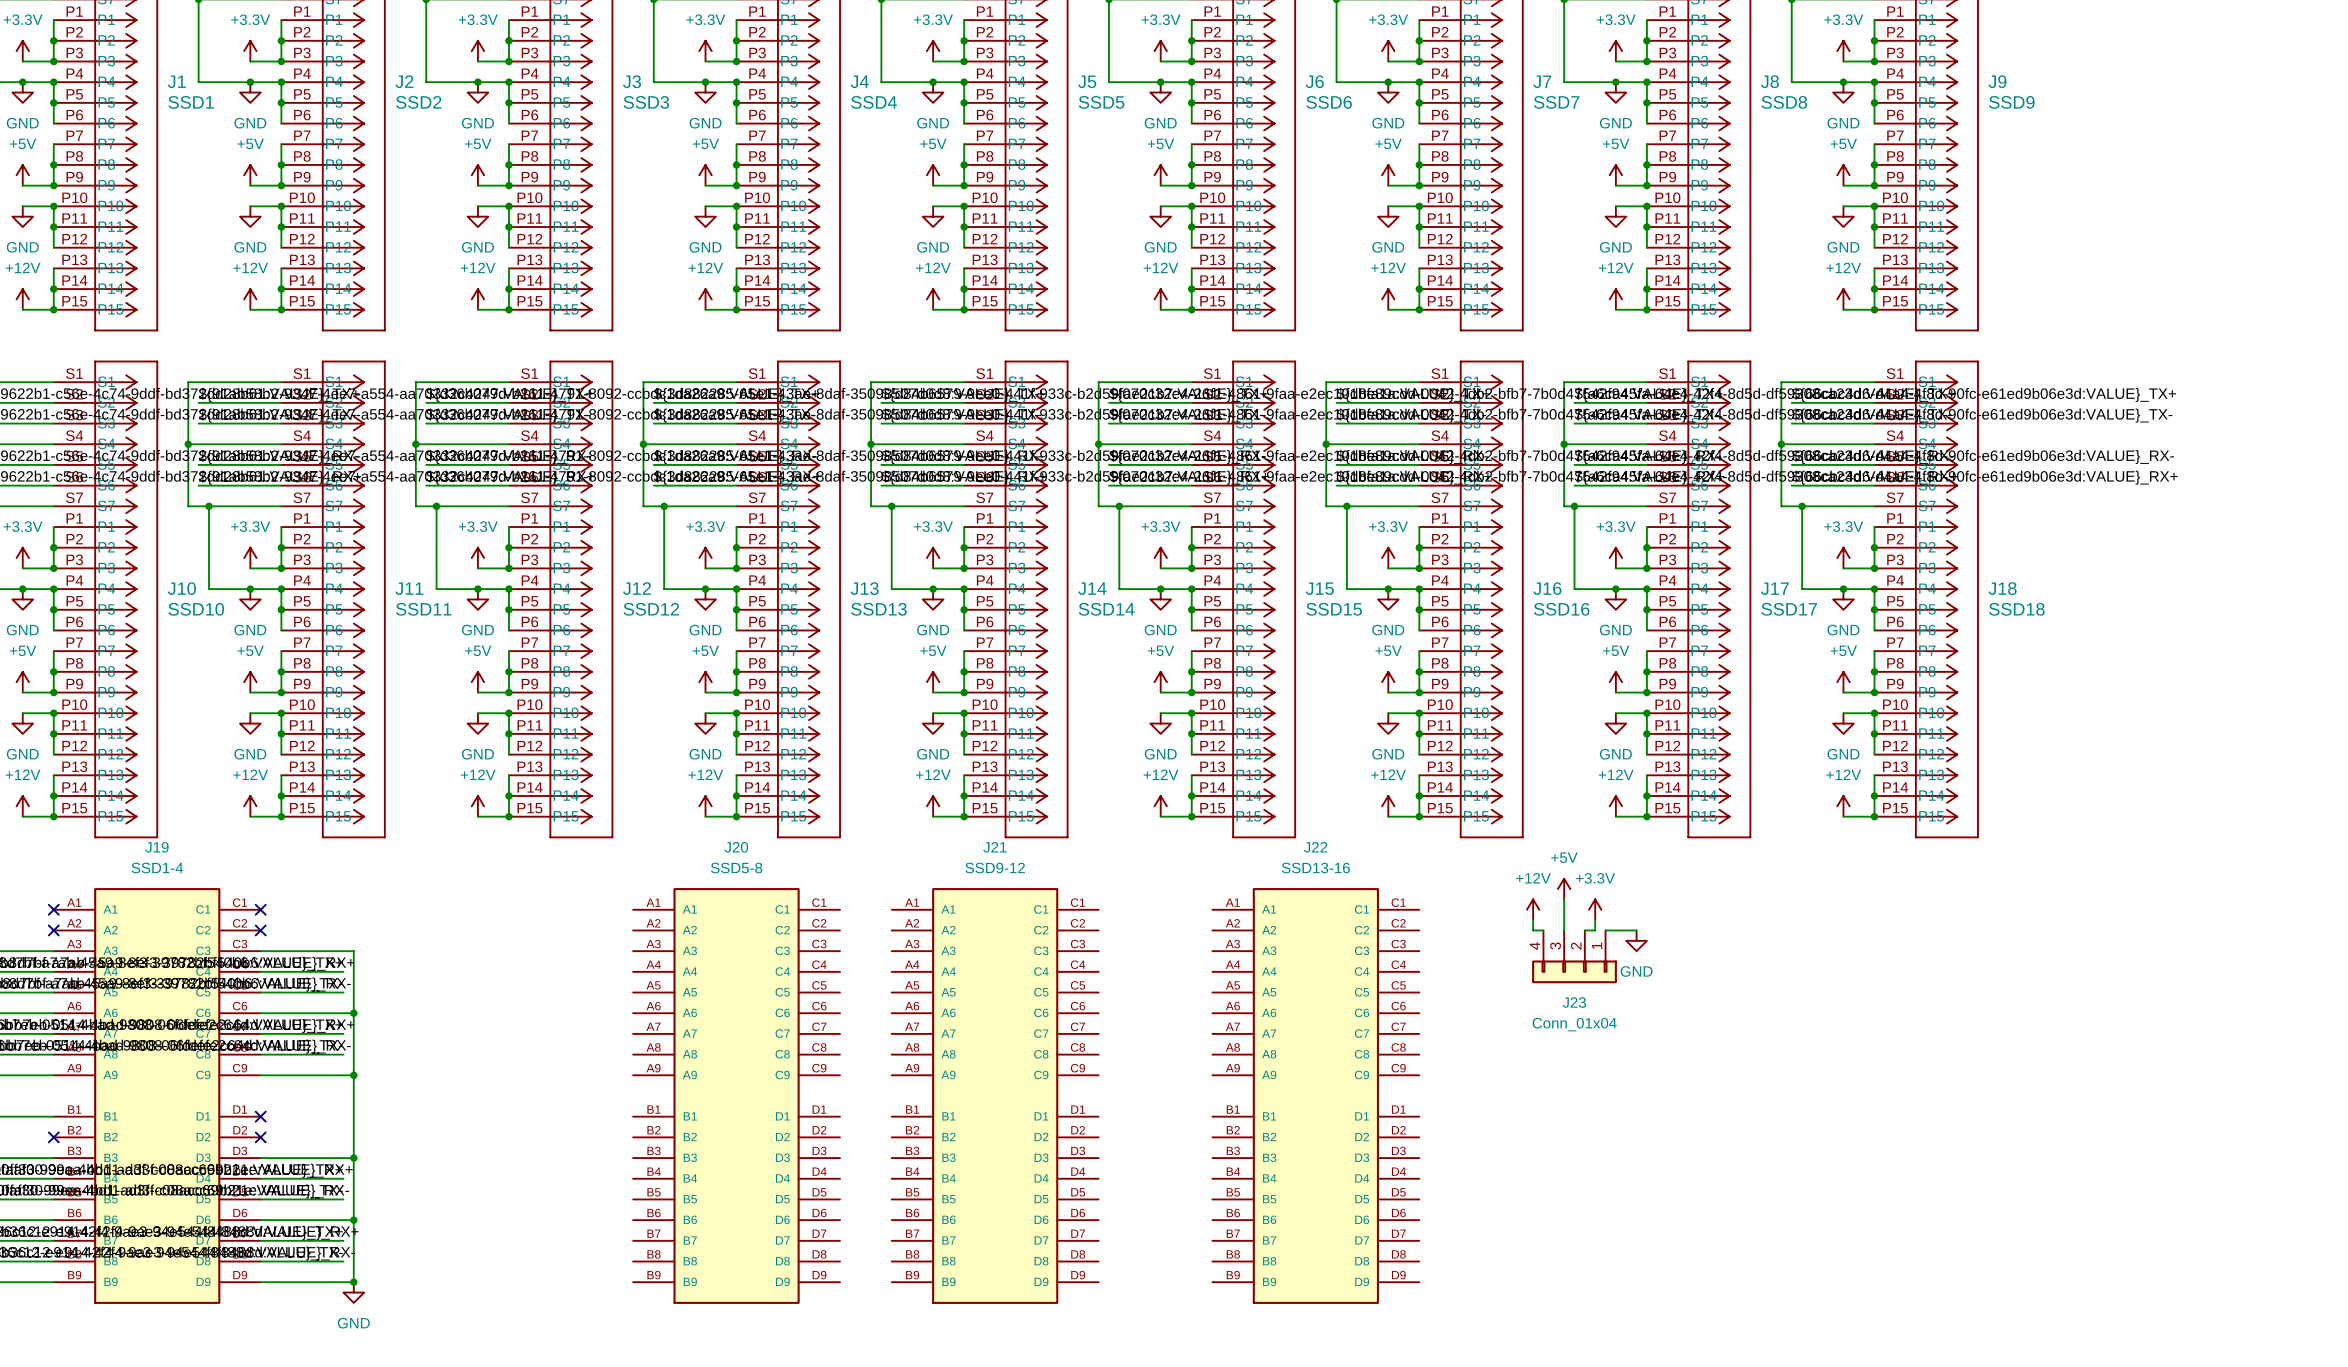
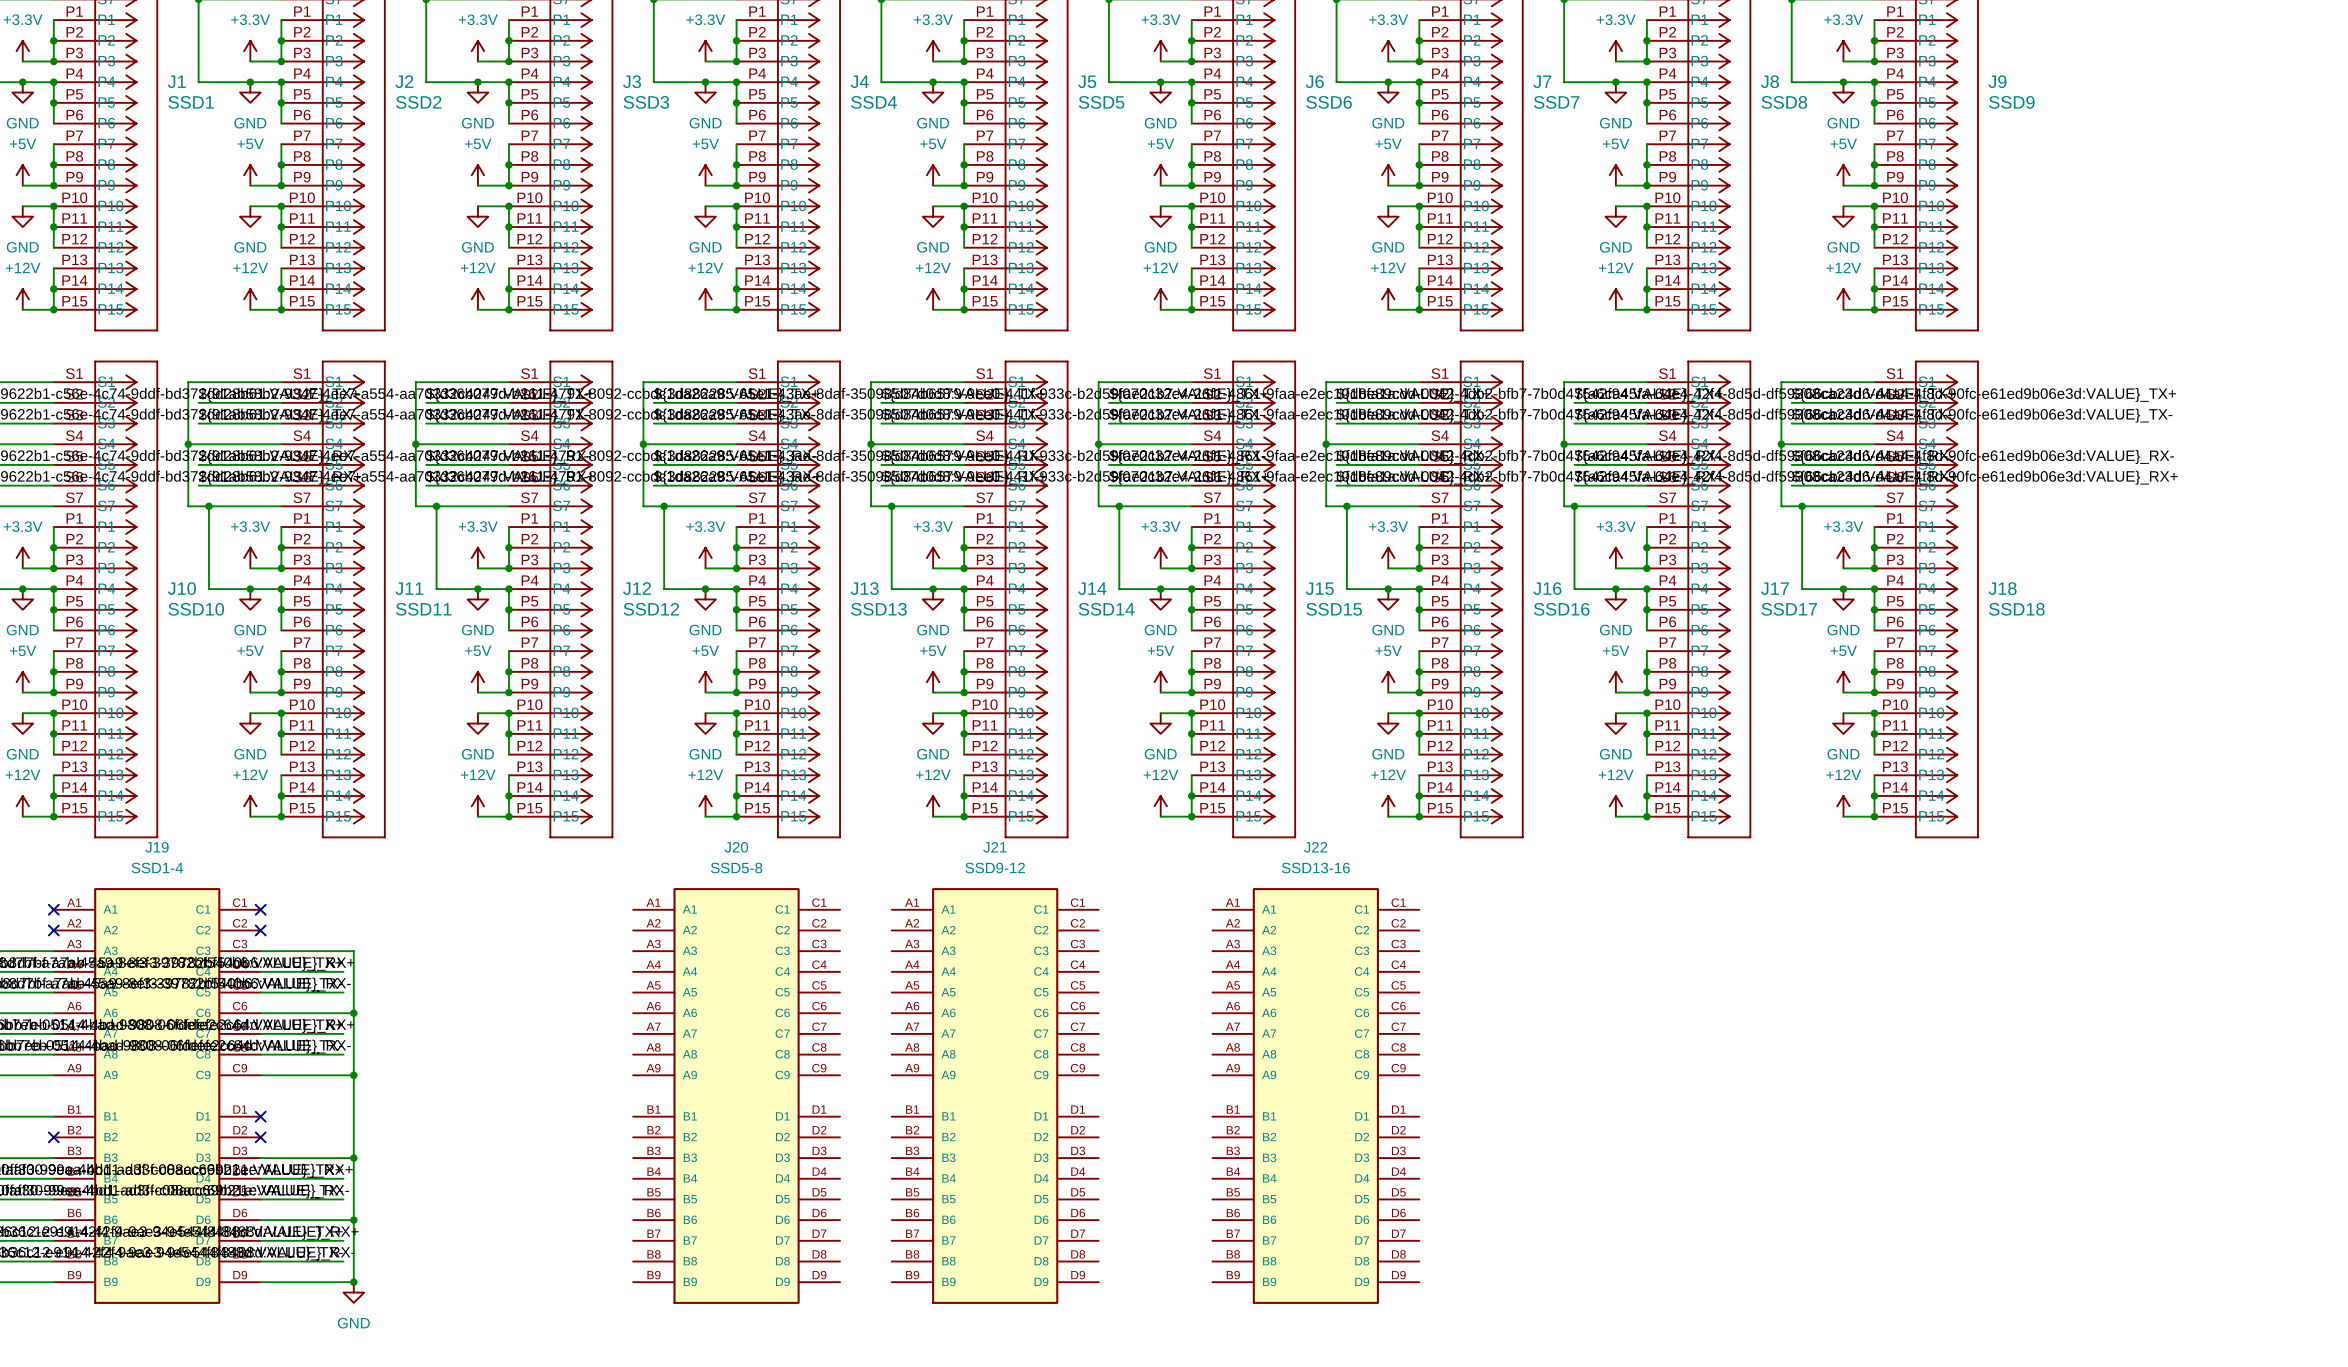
power symbol: +5V (1564, 889) -> none
wire: (1564, 899) (1564, 930) -> none
power symbol: +12V (1533, 909) -> none
power symbol: +3.3V (1595, 909) -> none
wire: (1533, 920) (1533, 930) (1543, 930) -> none
wire: (1595, 920) (1595, 930) (1584, 930) -> none
wire: (1605, 930) (1636, 930) -> none
power symbol: GND (1636, 940) -> none
J23: Conn_01x04 (1574, 956) -> none

